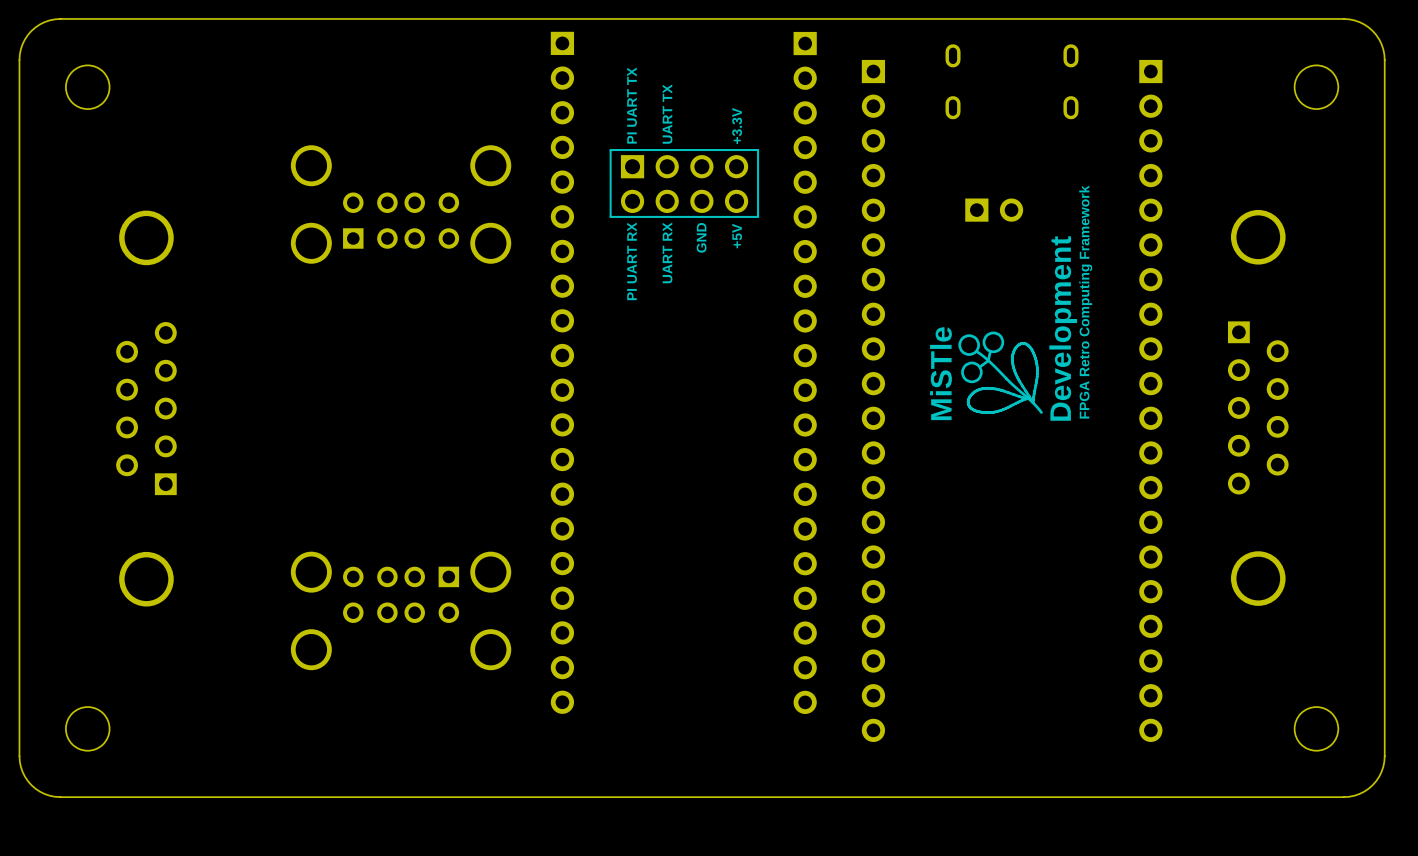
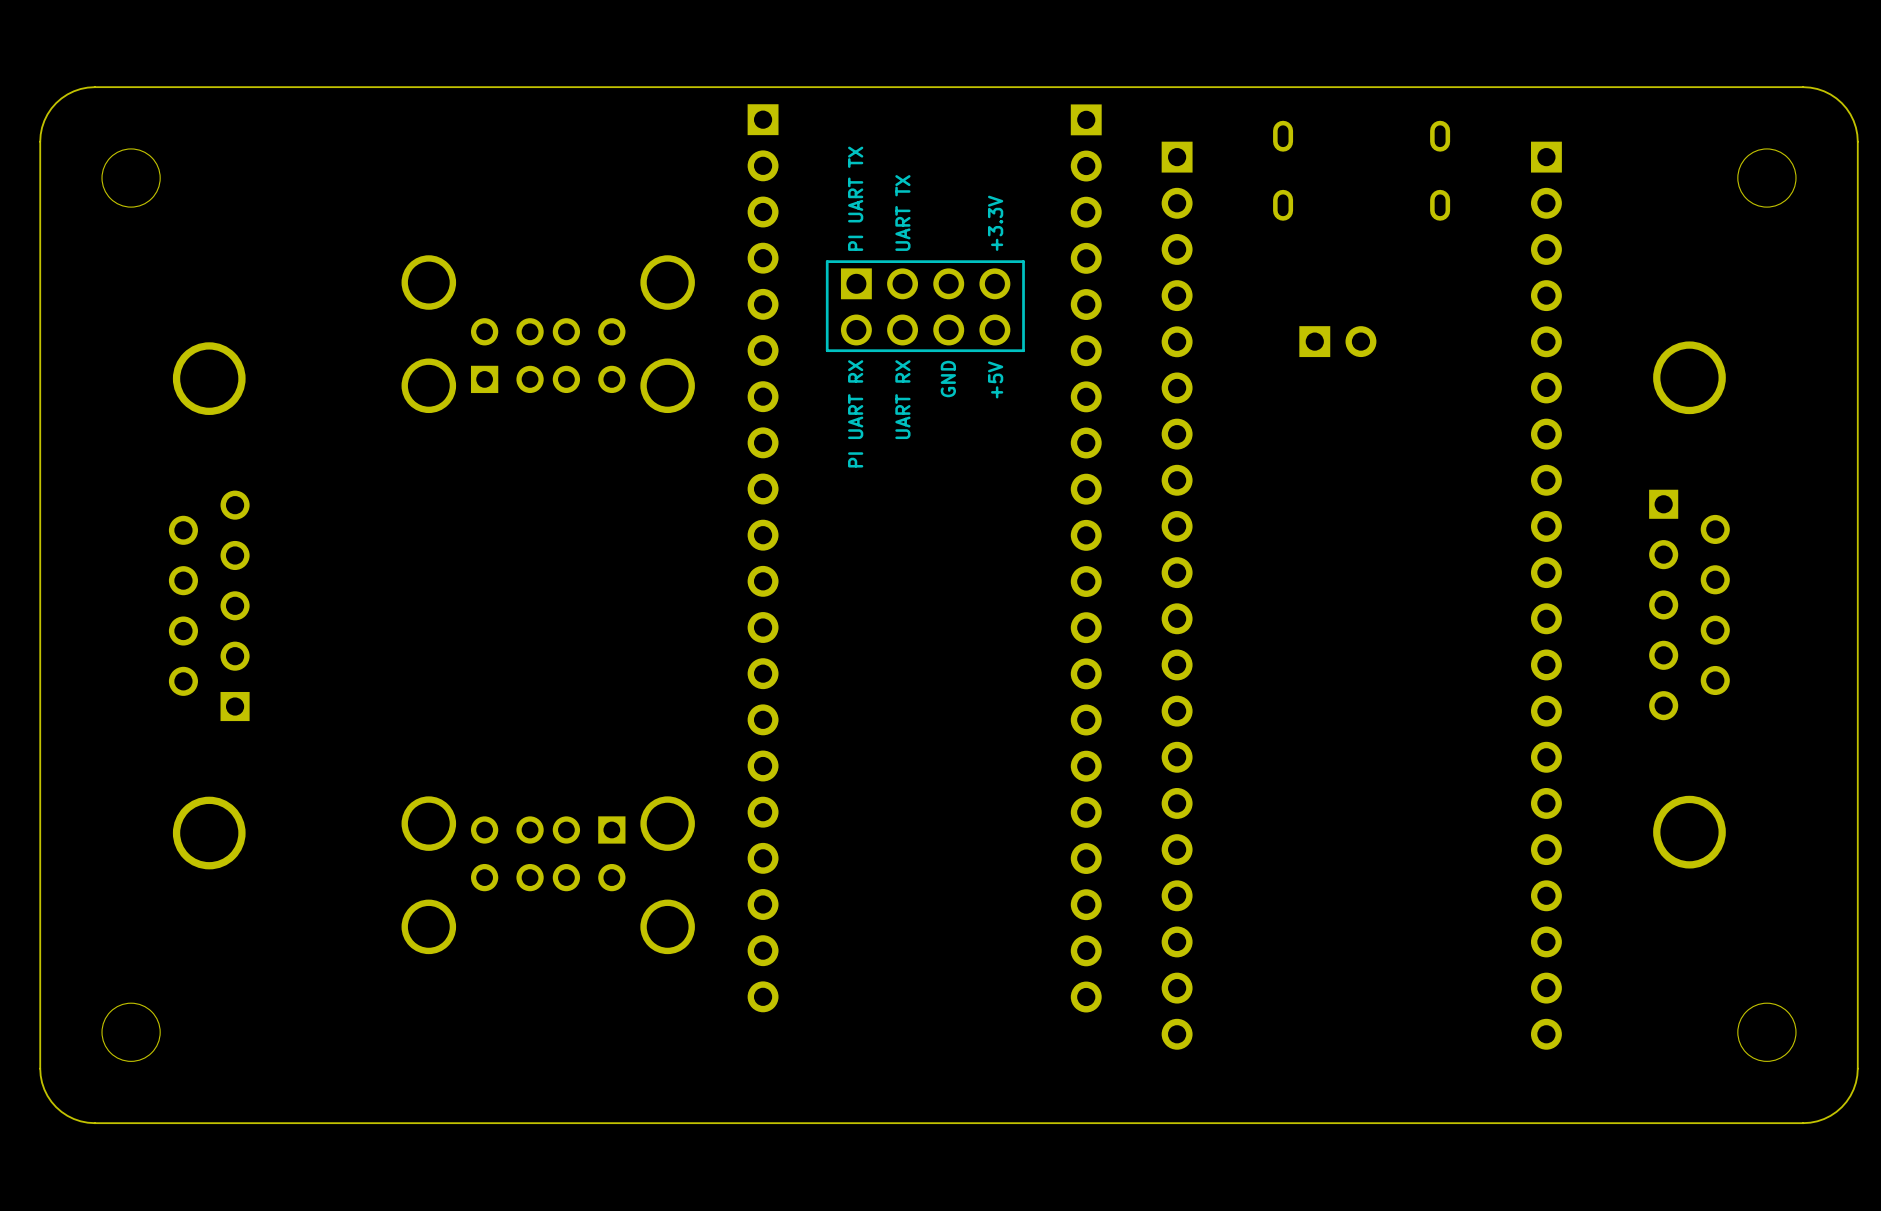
text: FPGA Retro Computing Framework (1085, 302) -> none
text: Development (1063, 328) -> none
drawing: [958, 331, 1005, 384] -> none
line: (1023, 343) (1019, 344) (1014, 349) (1012, 362) (1017, 377) (1033, 402) (1037, 376) (1036, 364) (1031, 348) (1023, 343) -> none
line: (976, 351) (989, 362) (1041, 412) -> none
line: (990, 351) (988, 360) (979, 367) -> none
text: MiSTle (940, 373) -> none
line: (988, 388) (978, 390) (971, 395) (968, 401) (970, 408) (980, 412) (994, 412) (1026, 398) (1000, 390) (988, 388) -> none

